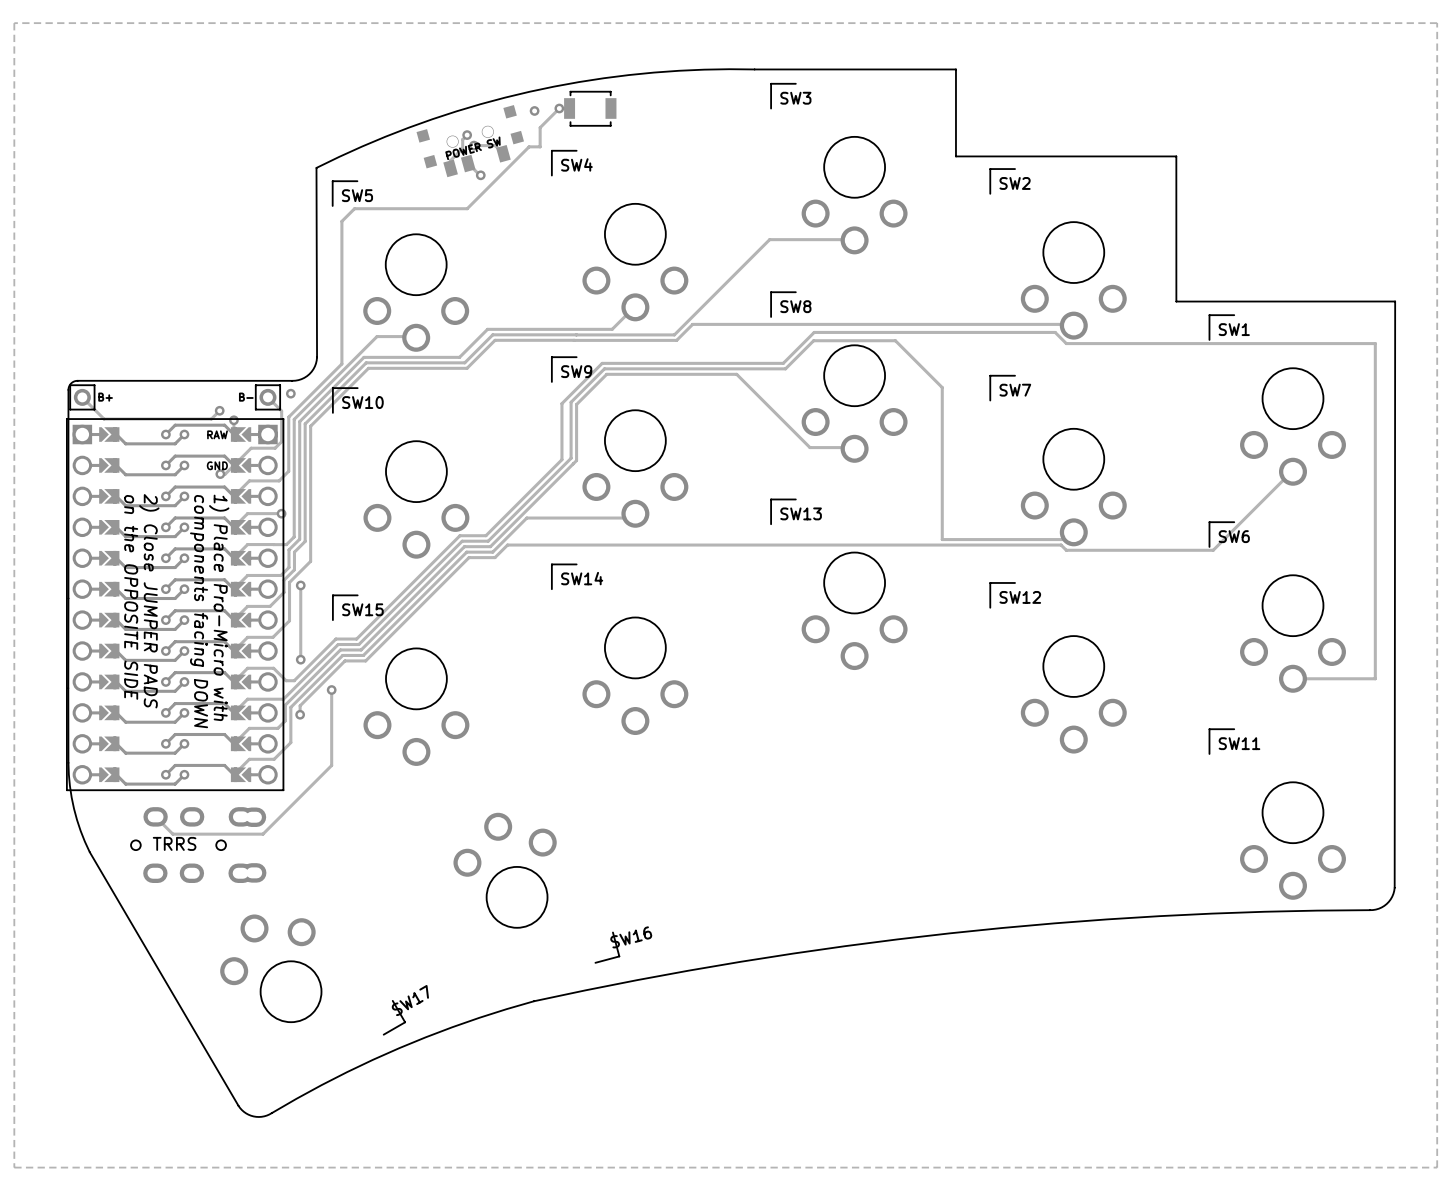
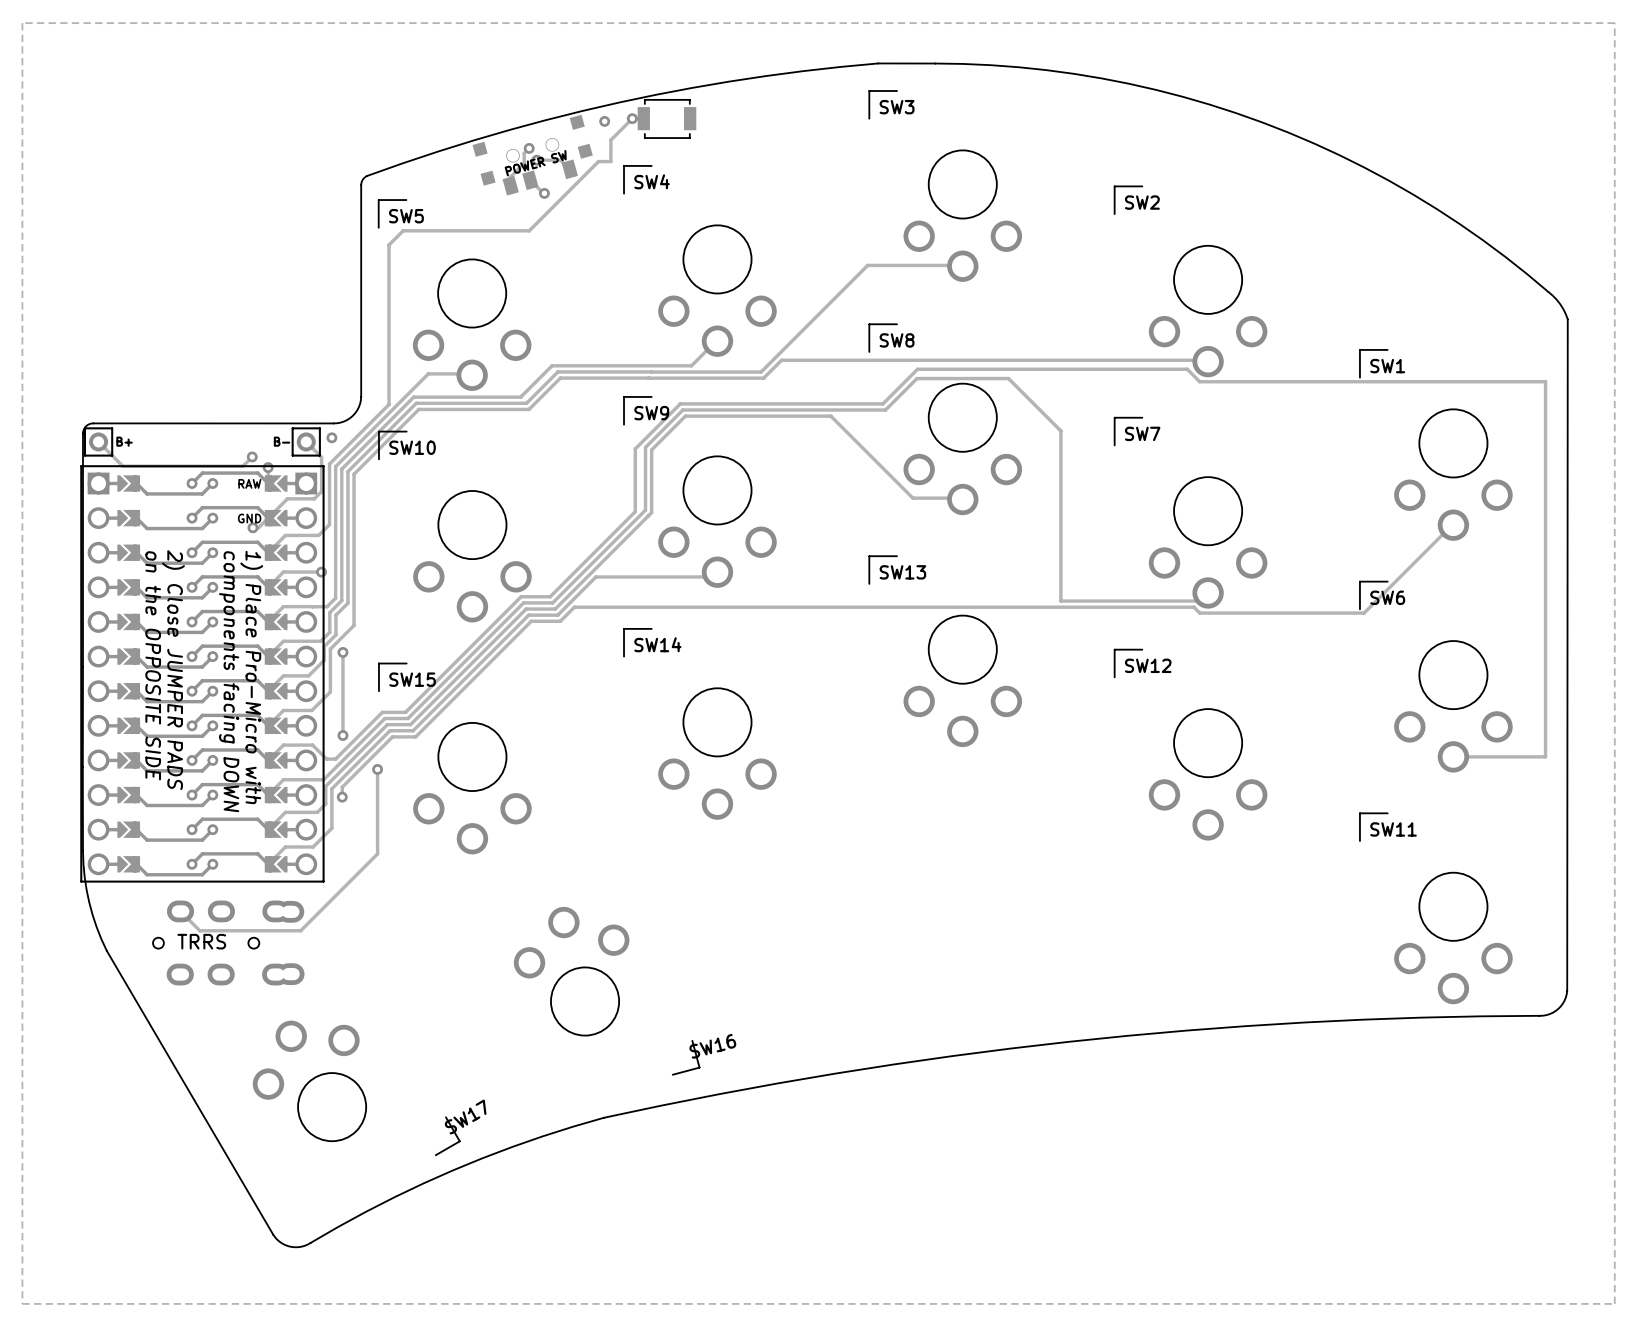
board edge: (1395, 301) (1176, 301) (1176, 156) (955, 156) (955, 69) (679, 70) (578, 82) (480, 104) (385, 136) (316, 167) (317, 357) -> (1567, 334) (1567, 319) (1556, 299) (1482, 240) (1436, 208) (1388, 180) (1339, 155) (1288, 132) (1236, 113) (1182, 96) (1101, 78) (1046, 70) (991, 65) (878, 63) (729, 81) (618, 102) (473, 140) (366, 176) (361, 185) (361, 397)

